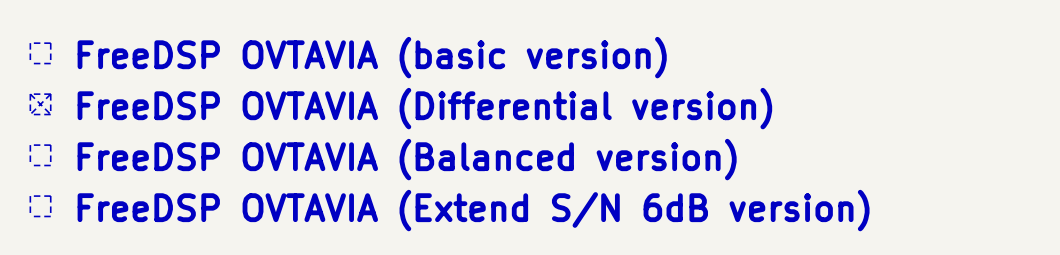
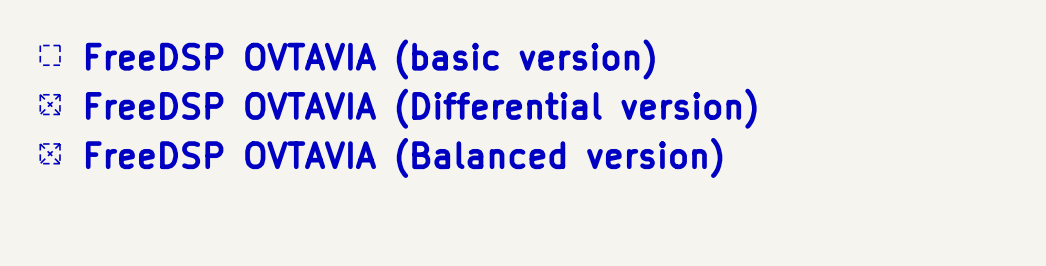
line: none -> (40, 143) (59, 163)
line: none -> (59, 143) (40, 163)
line: (30, 196) (30, 216) (50, 216) (50, 196) (30, 196) -> none
text: FreeDSP OVTAVIA (Extend S/N 6dB version) (473, 210) -> none

